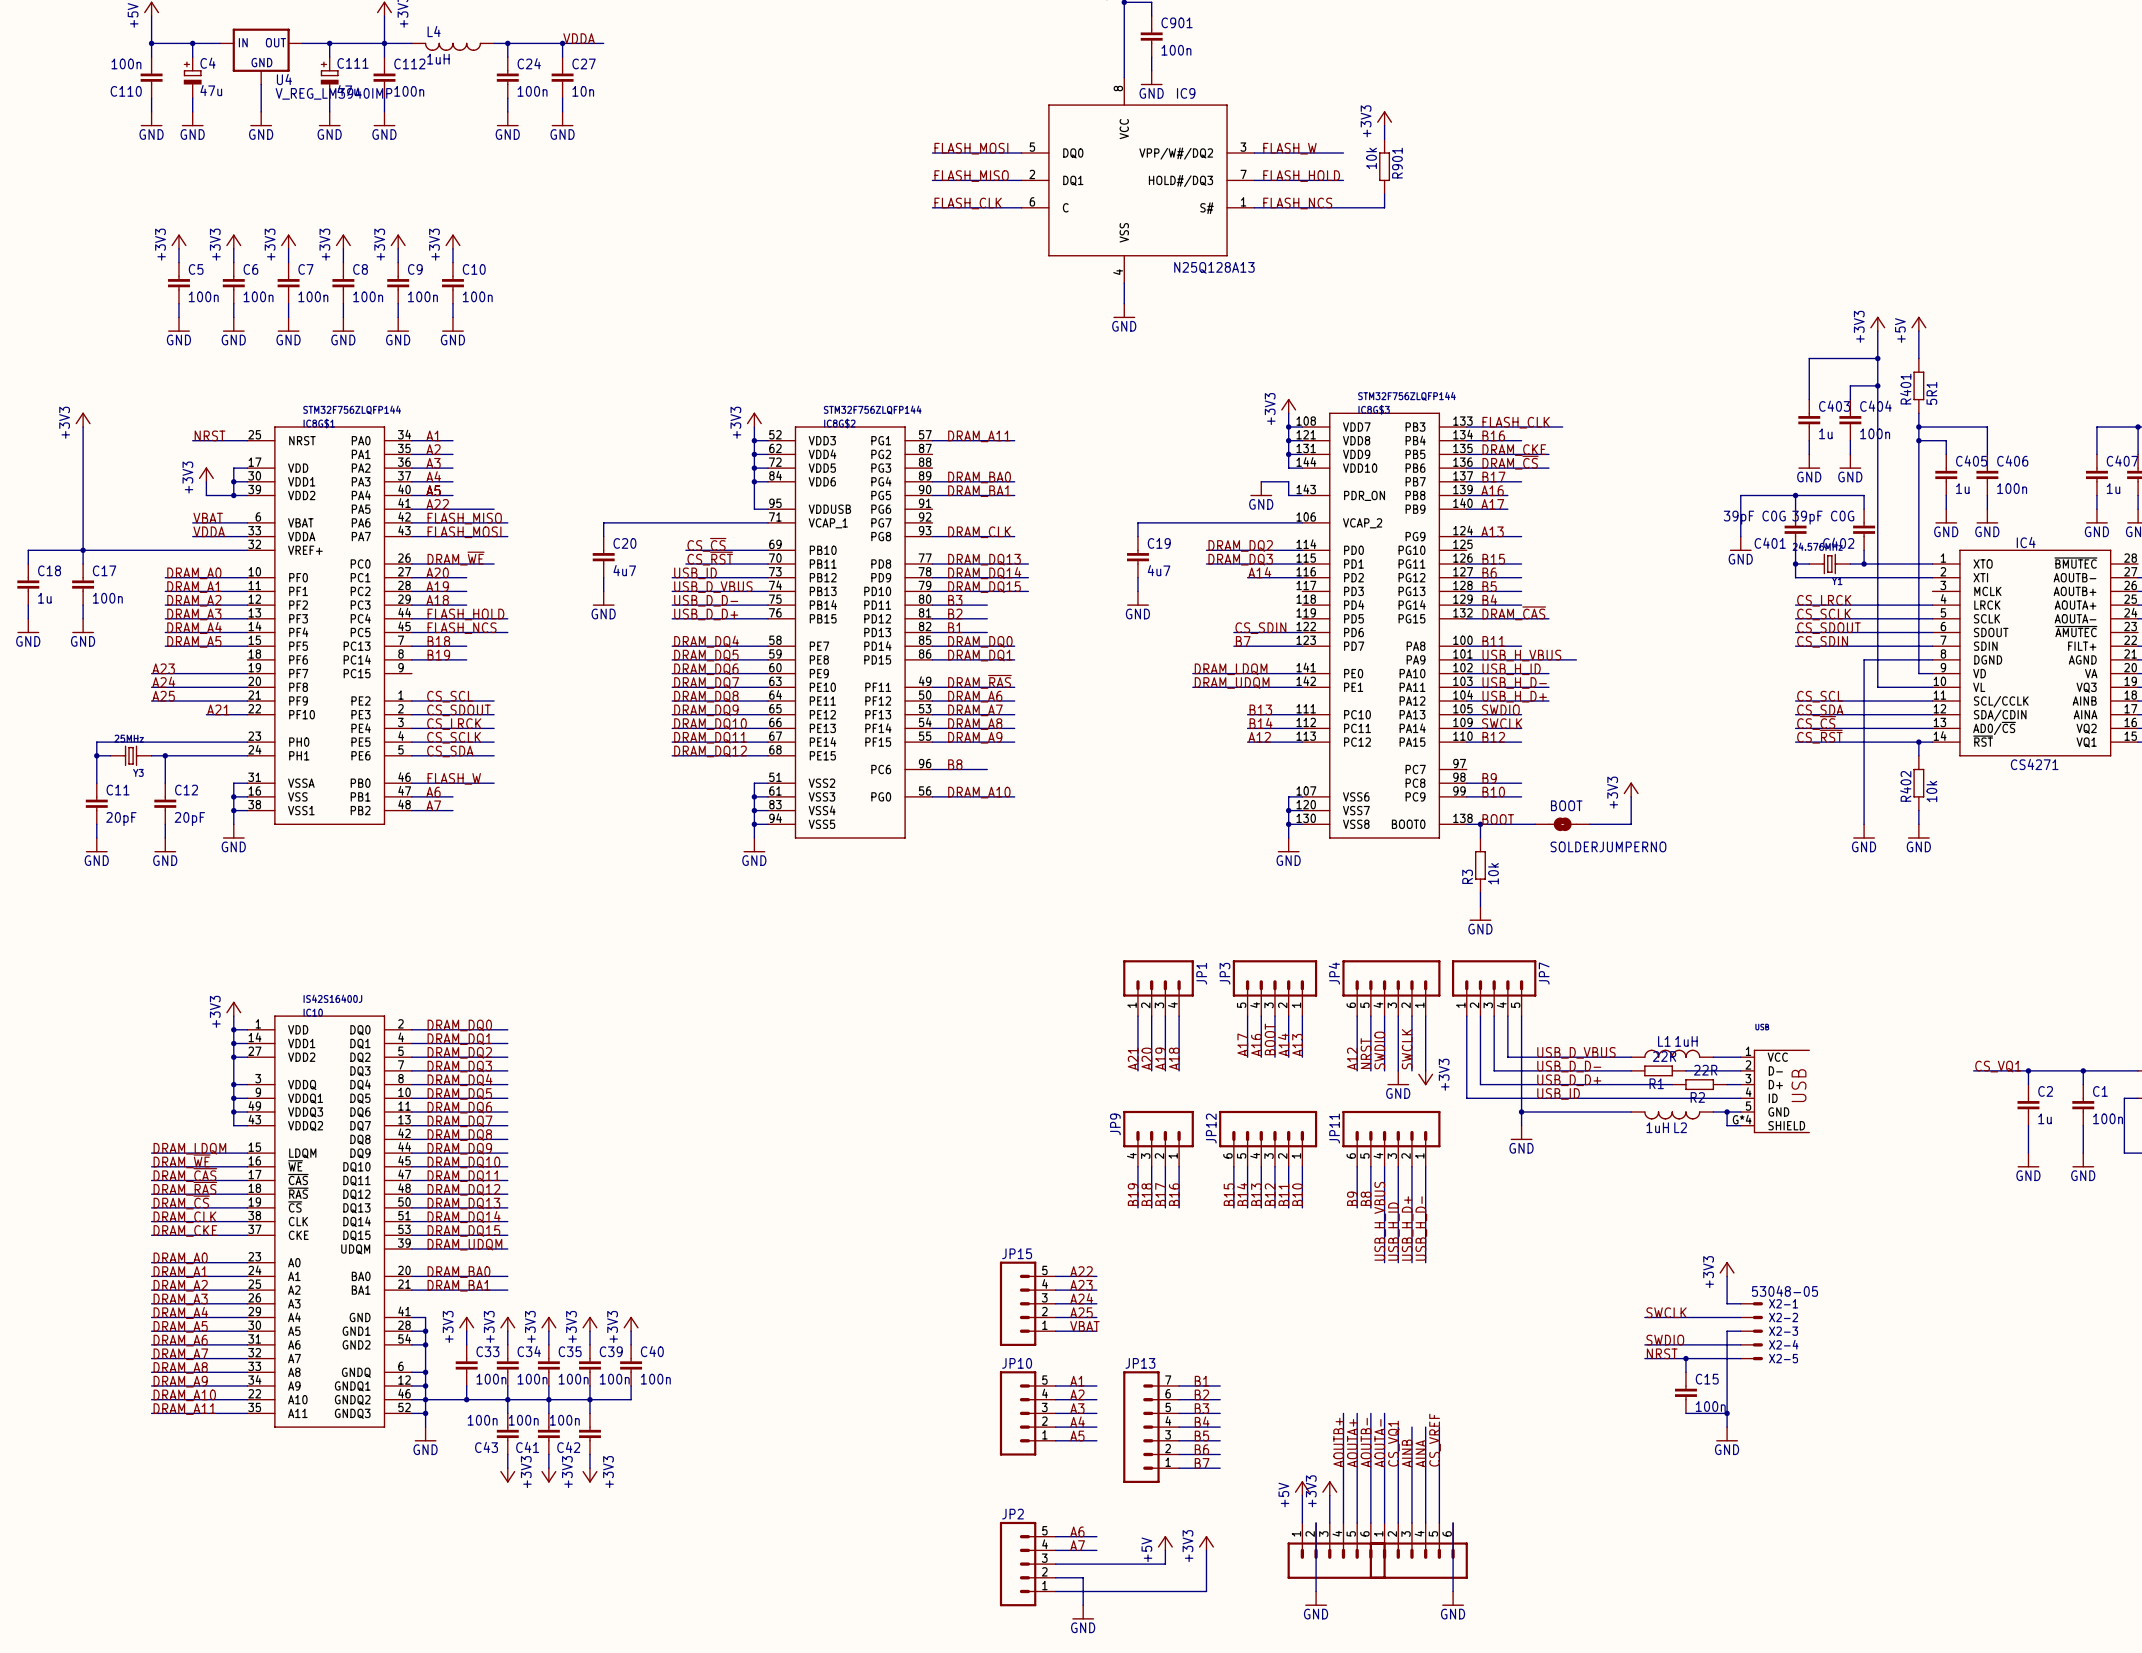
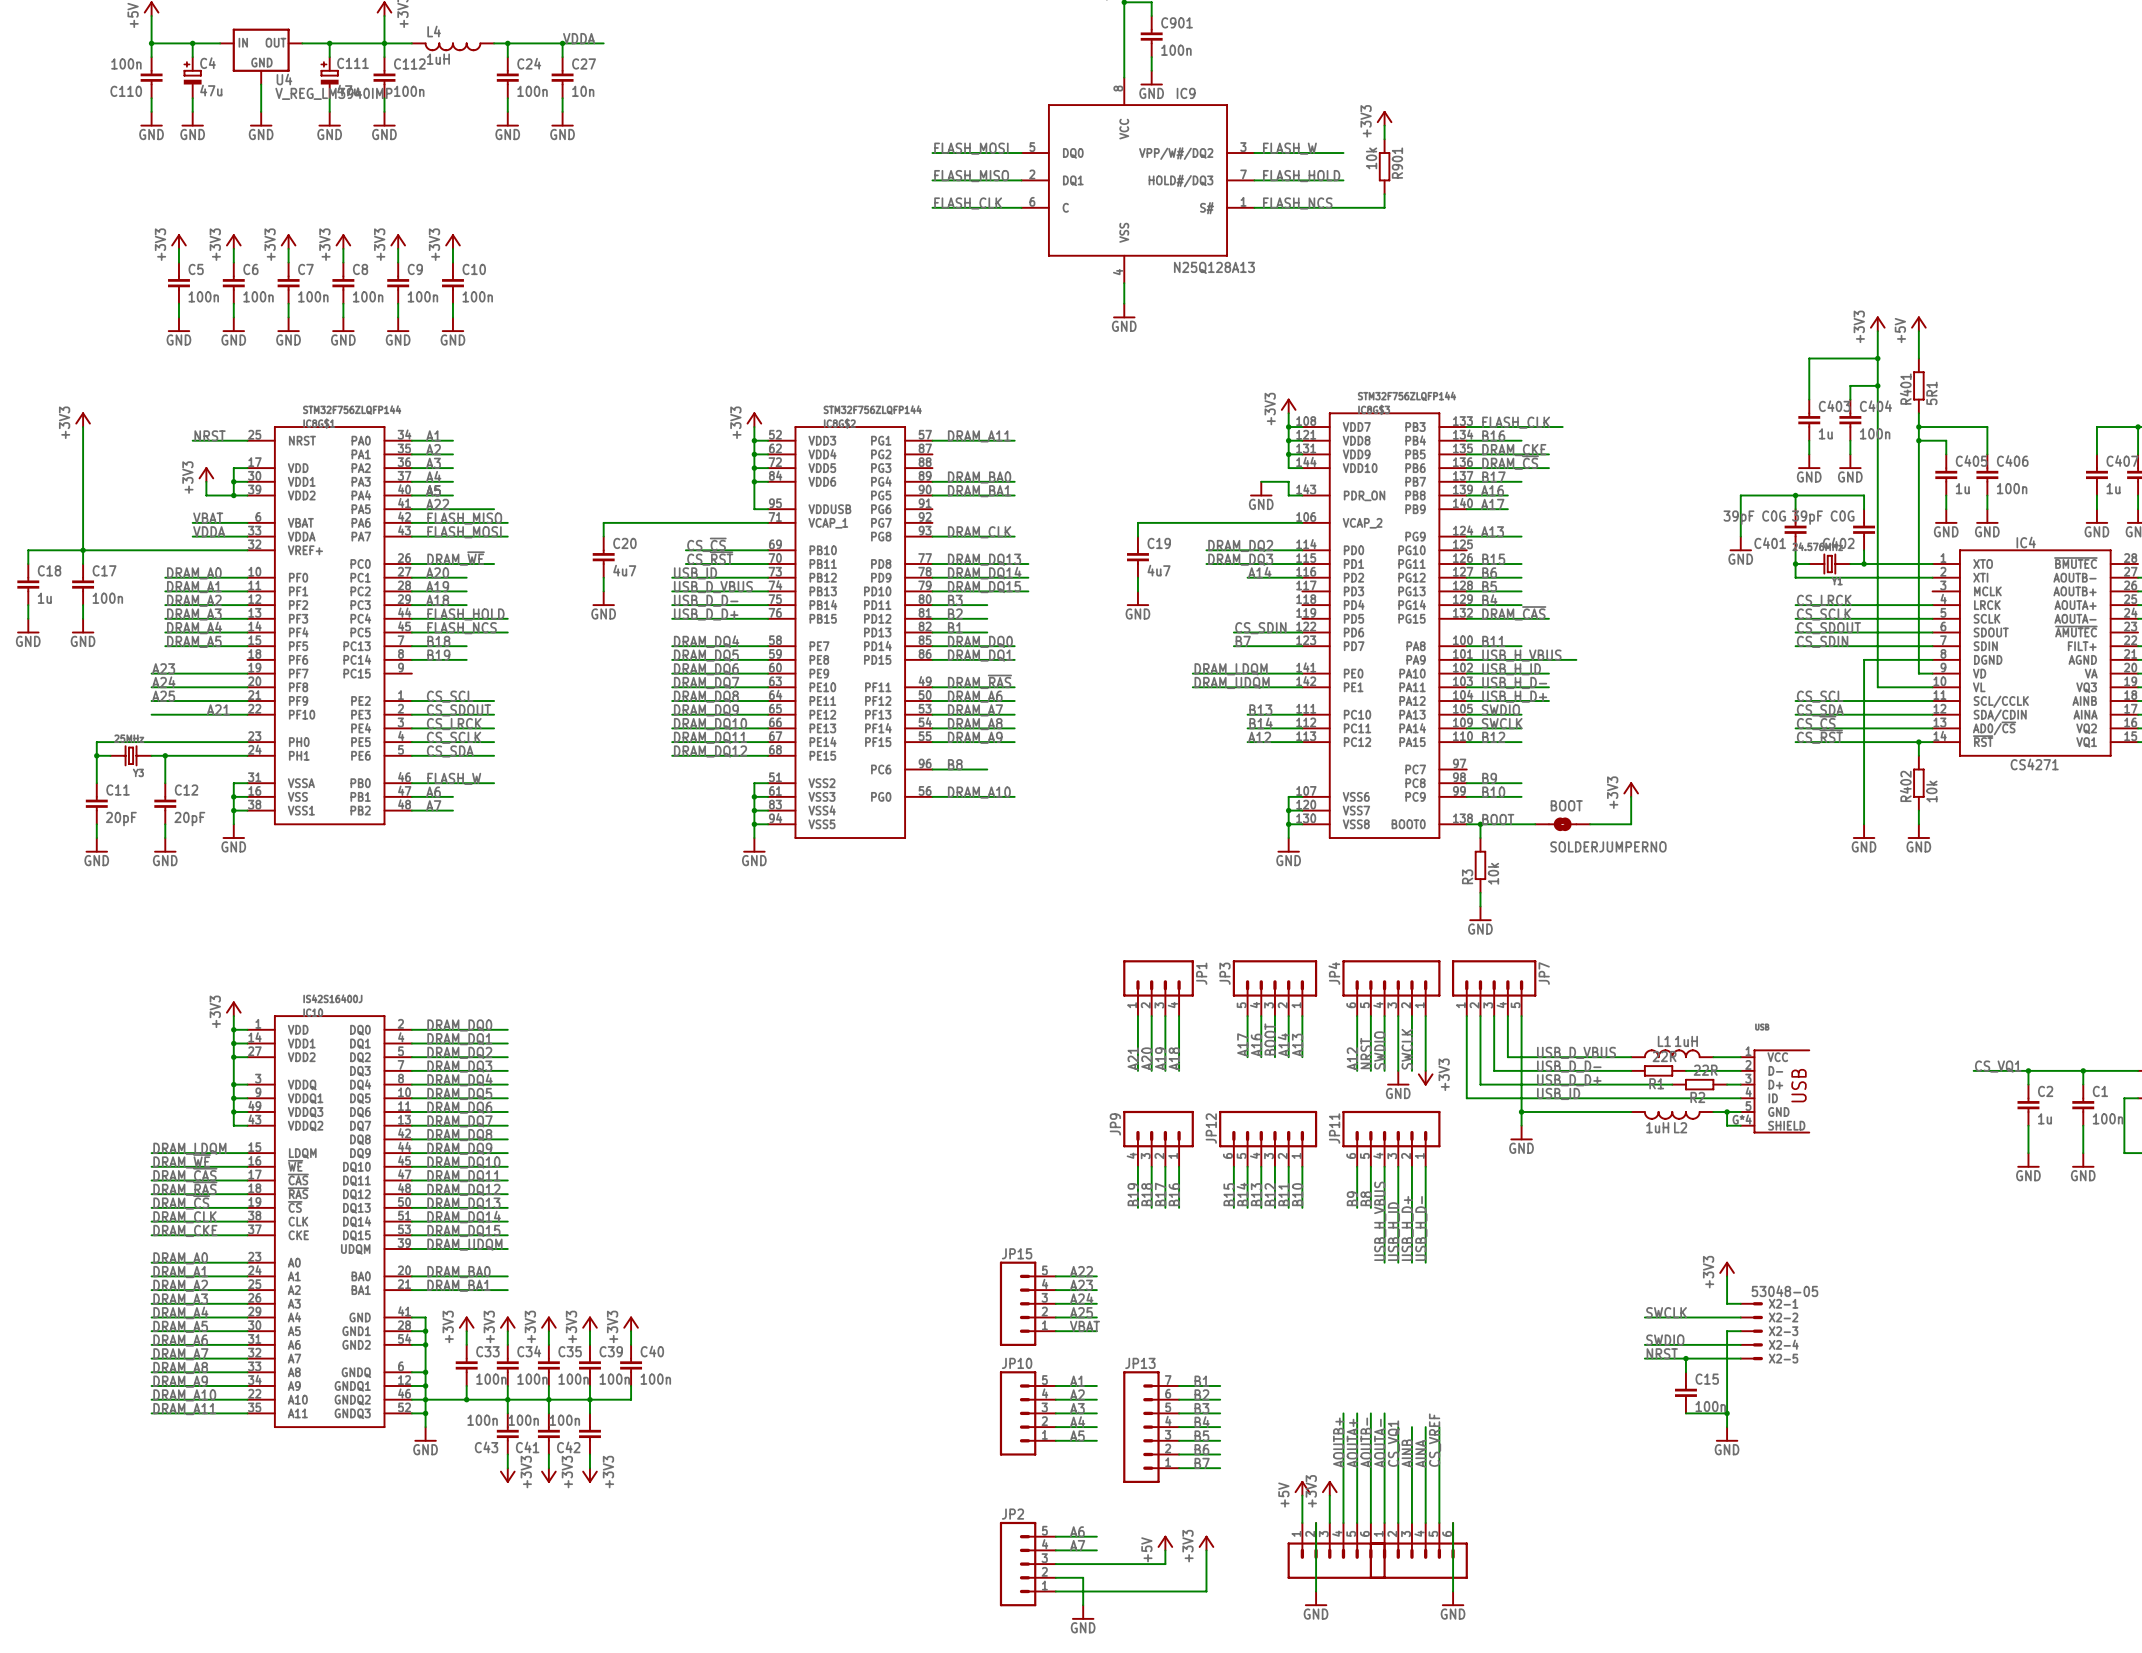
wire: none -> (151, 714) (206, 714)

